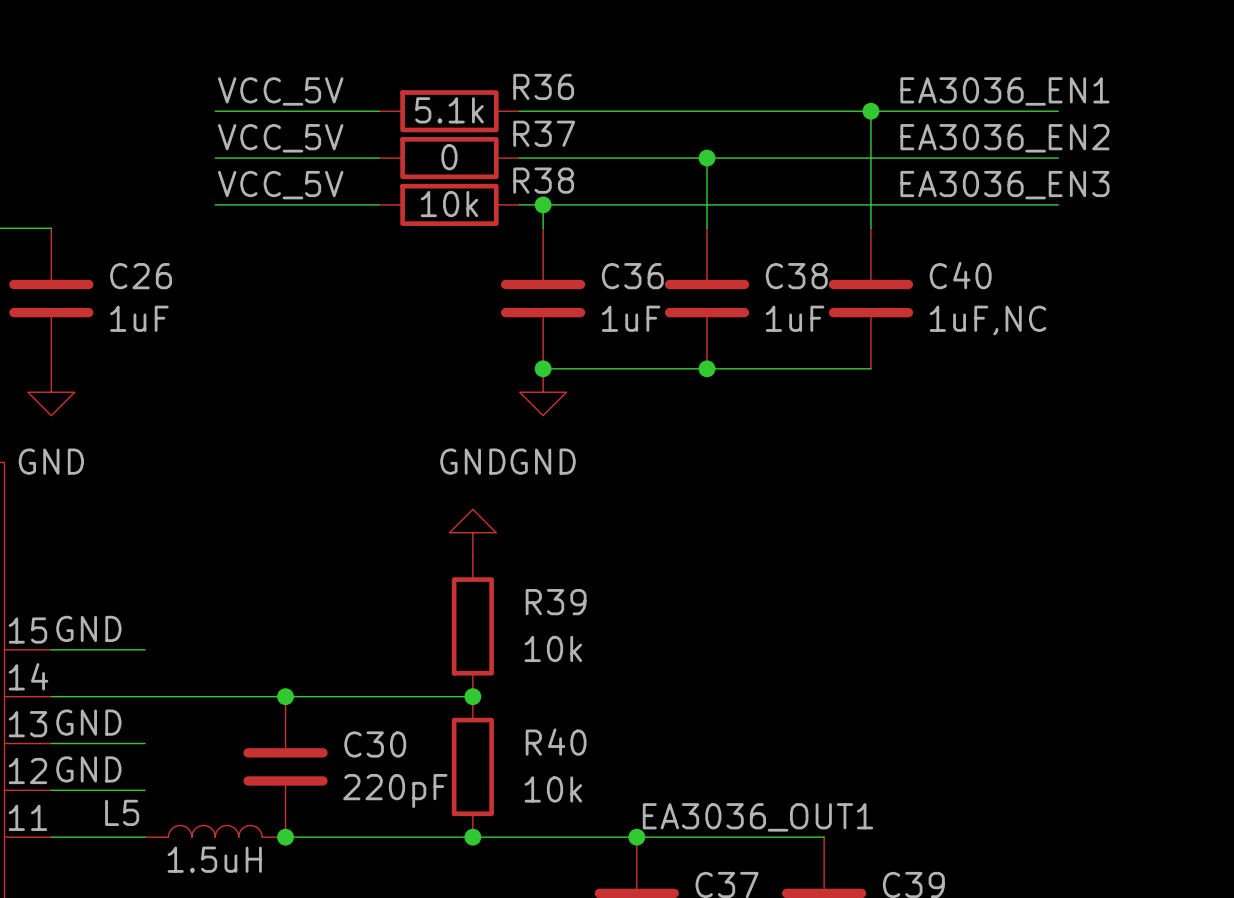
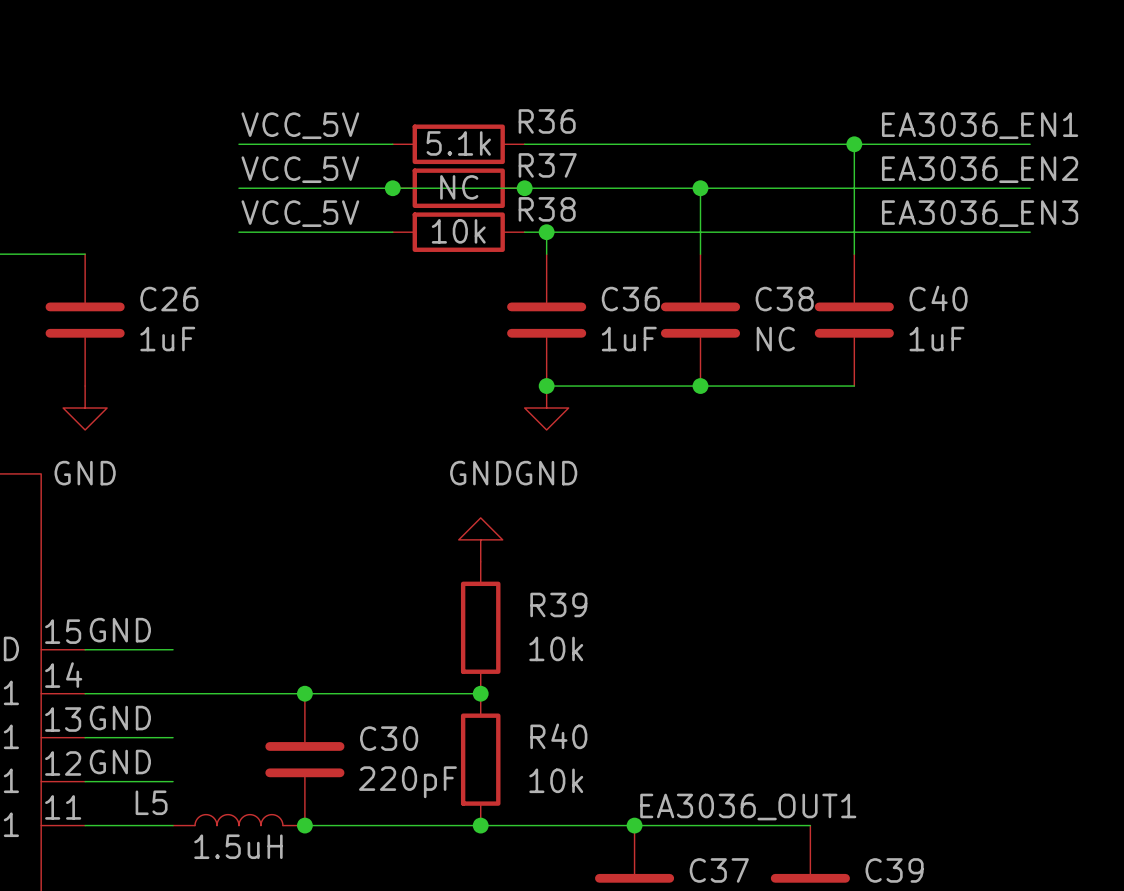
R37 value: 0 (449, 157) -> NC (459, 187)
wire: none -> (392, 188) (524, 188)
junction: none -> (392, 188)
junction: none -> (524, 188)
C38 value: 1uF (795, 318) -> NC (775, 339)
C40 value: 1uF,NC (988, 320) -> 1uF (936, 339)

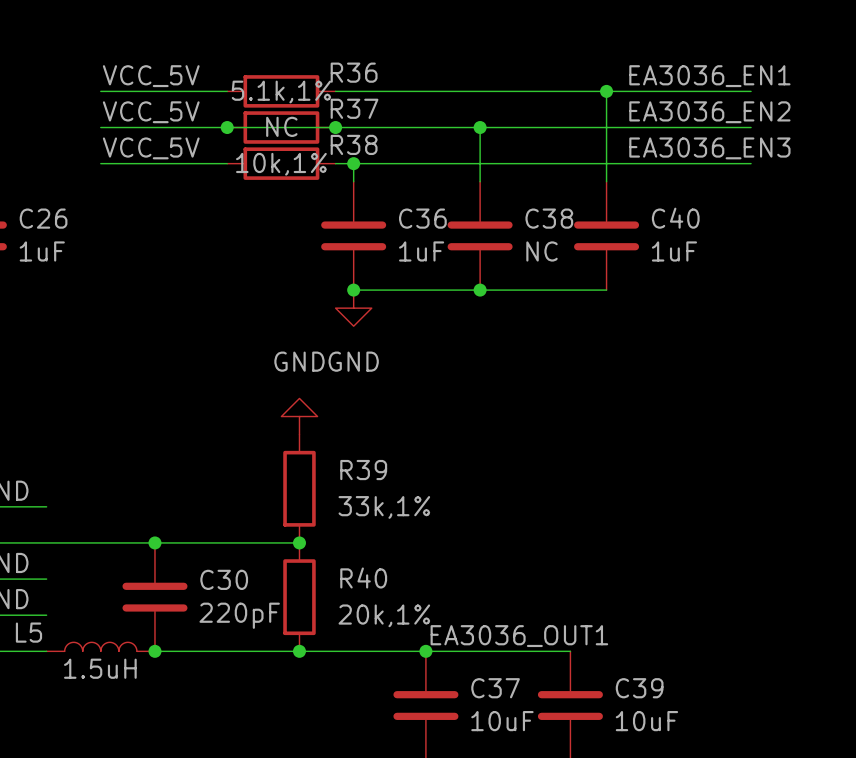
R36 value: 5.1k (458, 143) -> 5.1k,1% (281, 92)
R38 value: 10k (458, 231) -> 10k,1% (281, 164)
R39 value: 10k (556, 648) -> 33k,1% (384, 507)
R40 value: 10k (556, 780) -> 20k,1% (384, 615)

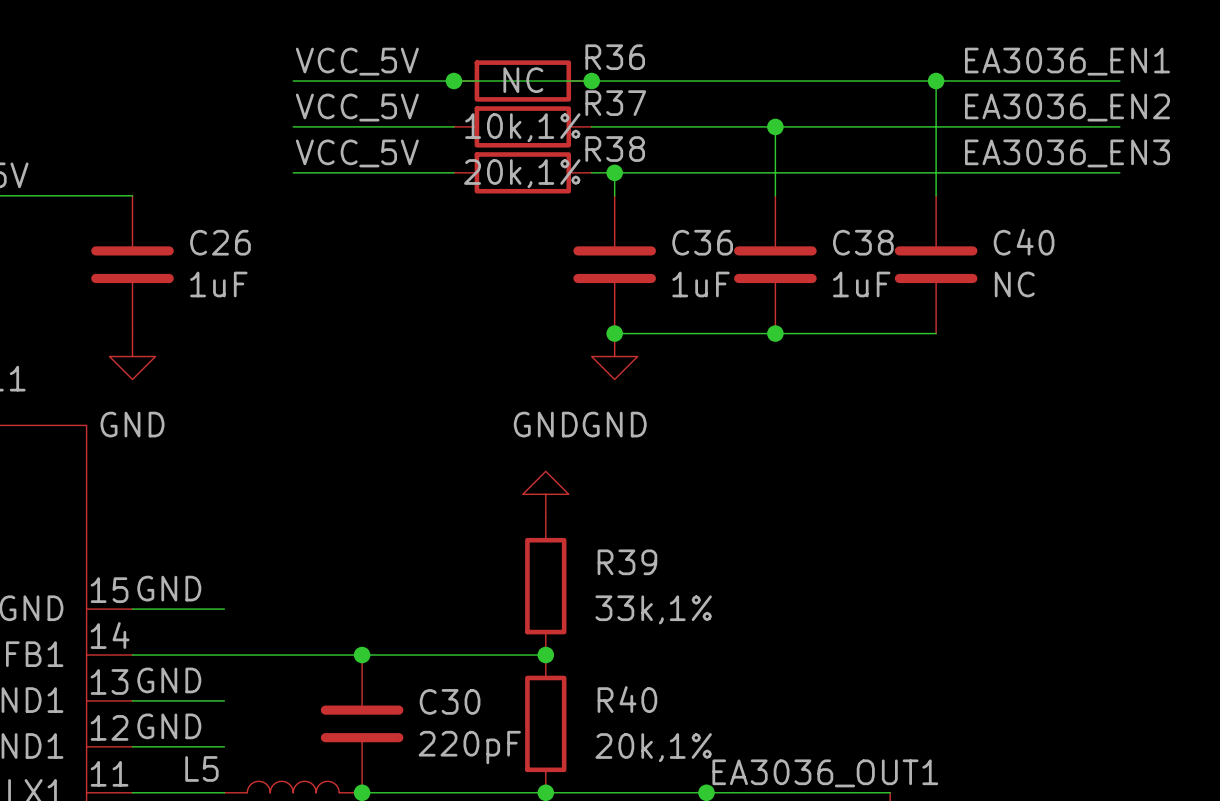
R36 value: 5.1k,1% (281, 92) -> NC (523, 80)
R37 value: NC (281, 126) -> 10k,1% (522, 127)
wire: (227, 127) (335, 127) -> (453, 81) (591, 81)
junction position: (227, 127) -> (453, 81)
junction position: (335, 127) -> (591, 81)
R38 value: 10k,1% (281, 164) -> 20k,1% (522, 173)
C38 value: NC (542, 251) -> 1uF (861, 284)
C40 value: 1uF (674, 251) -> NC (1014, 284)

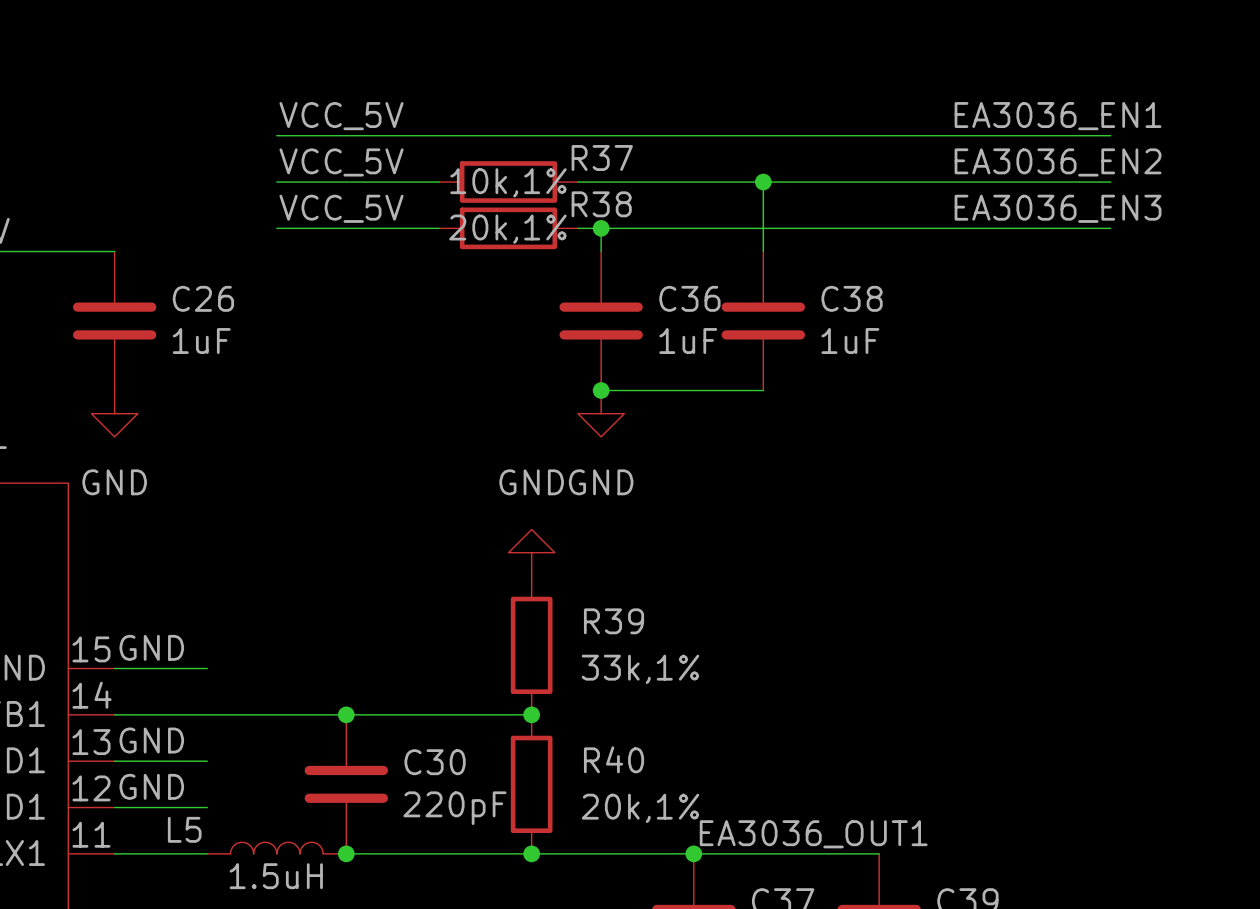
junction: (453, 81) -> none
R36: NC (522, 81) -> none
junction: (591, 81) -> none
wire: (936, 81) (936, 195) -> none
junction: (936, 81) -> none
C40: NC (936, 264) -> none
wire: (775, 333) (936, 333) -> none
junction: (775, 333) -> none

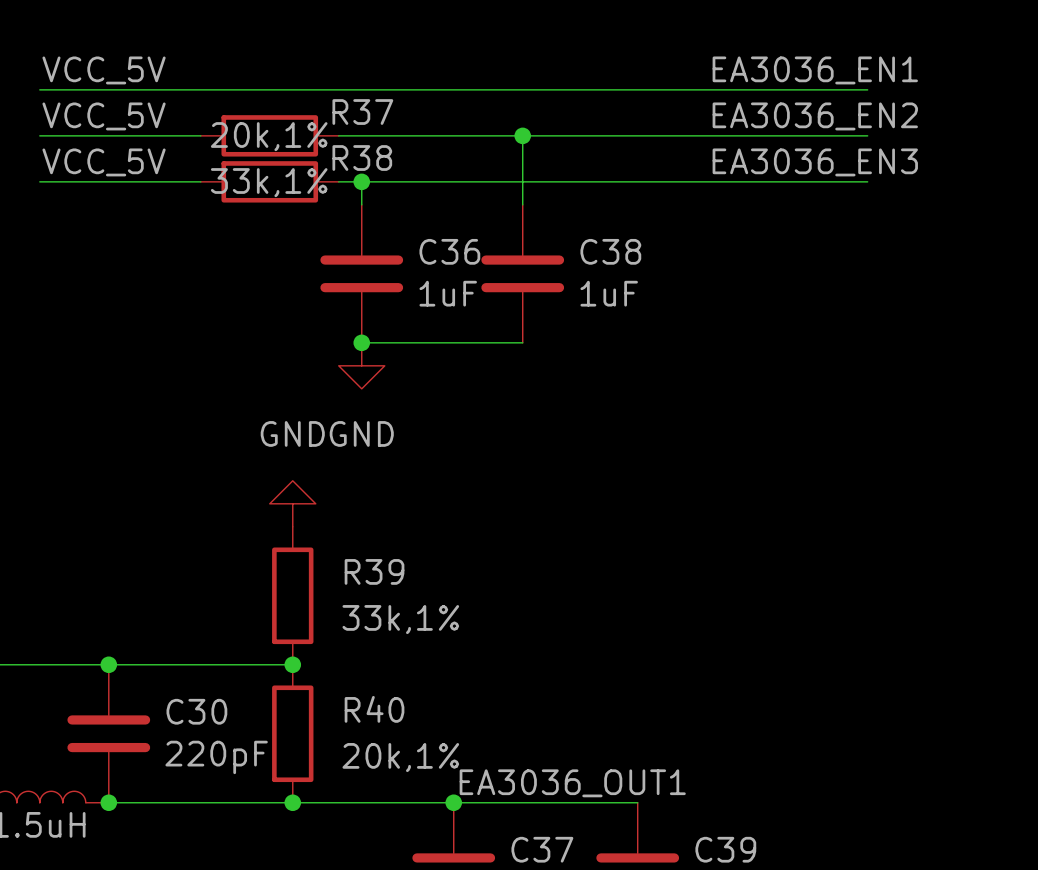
R37 value: 10k,1% (508, 182) -> 20k,1% (269, 136)
R38 value: 20k,1% (507, 229) -> 33k,1% (269, 182)

